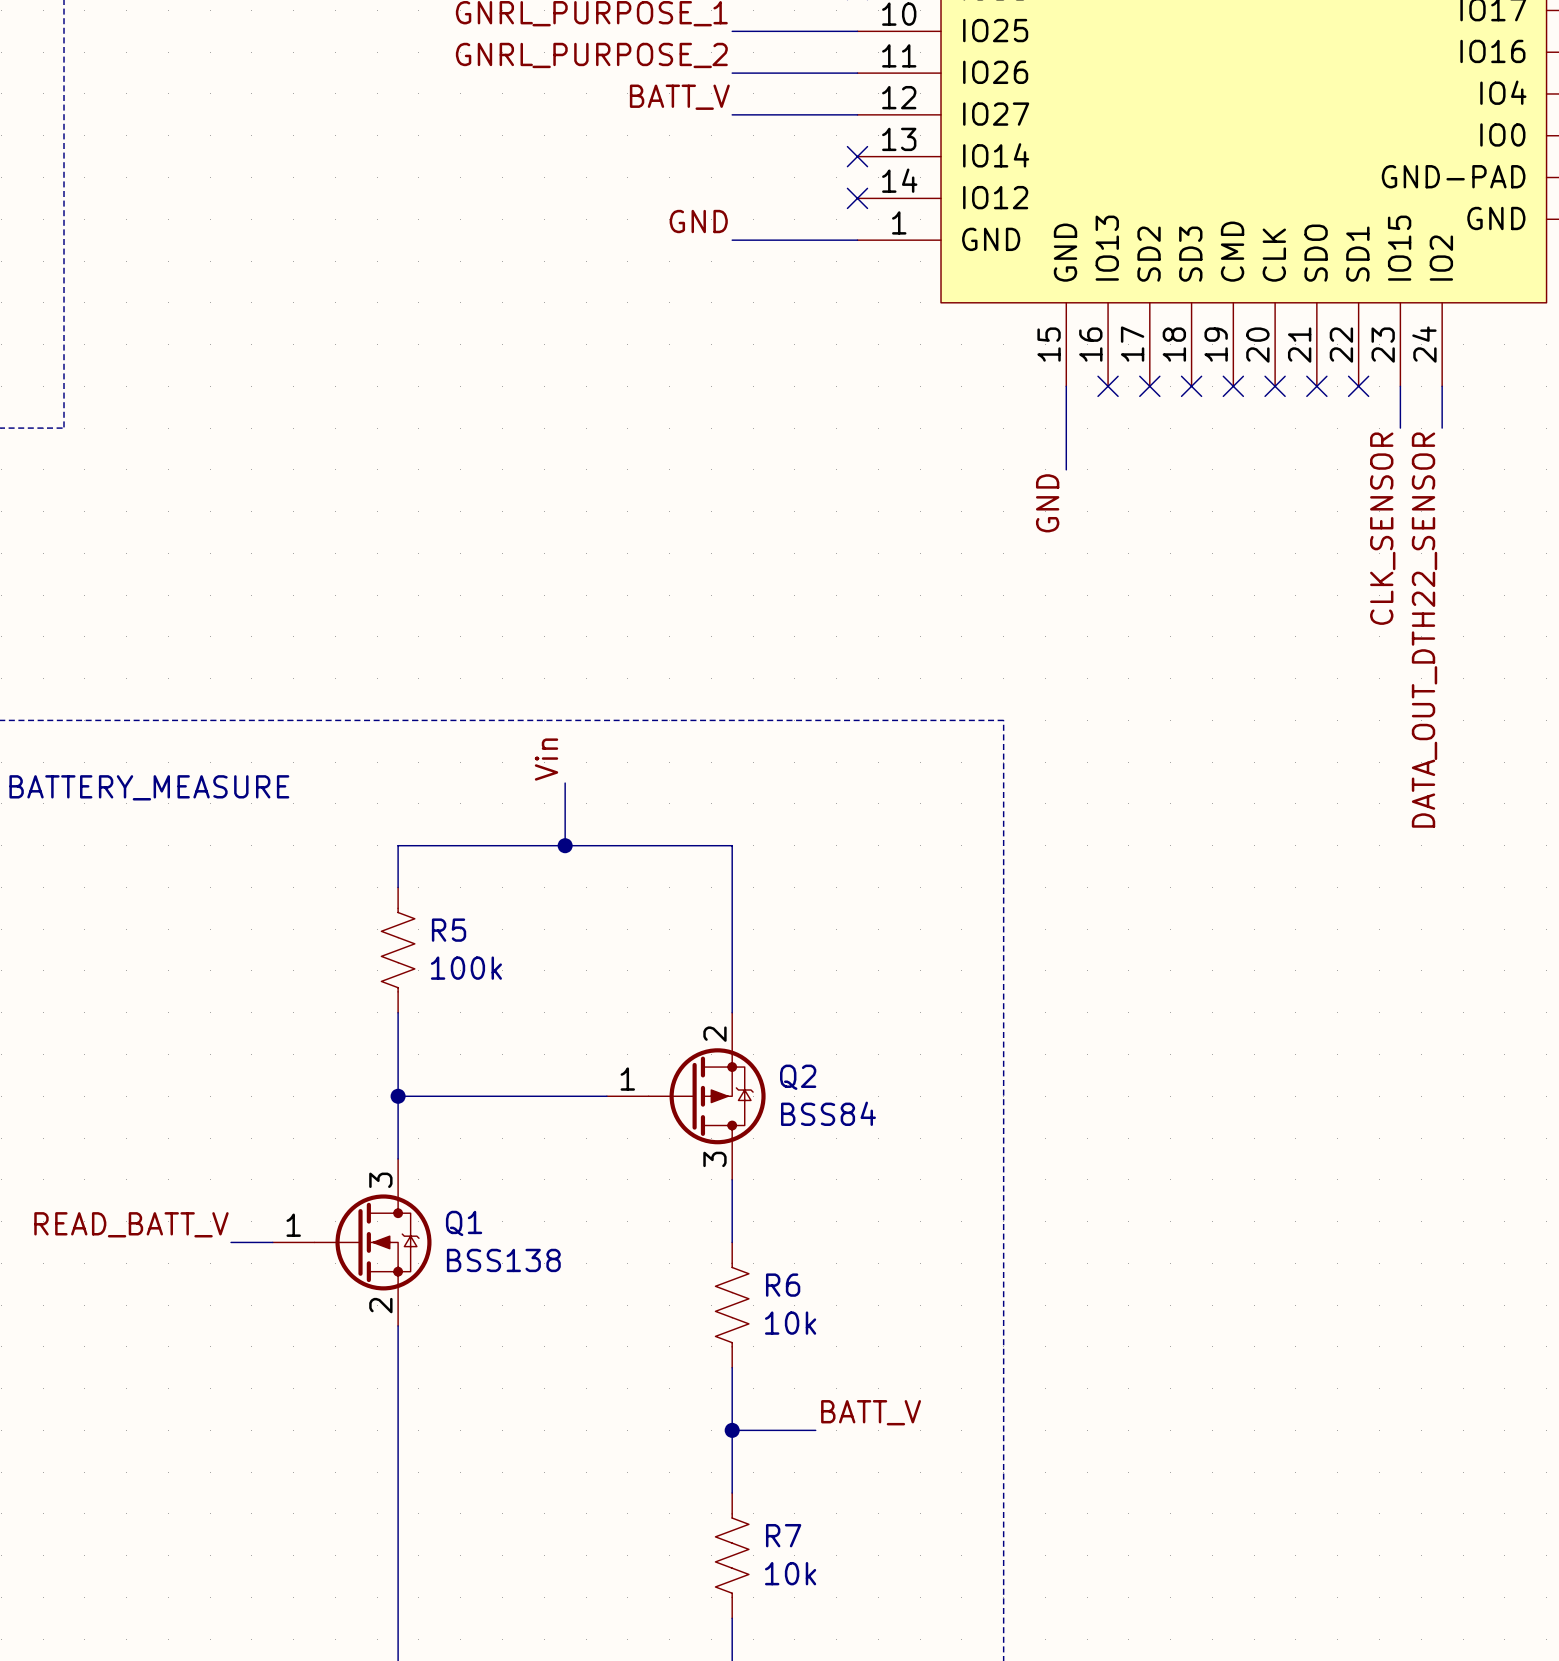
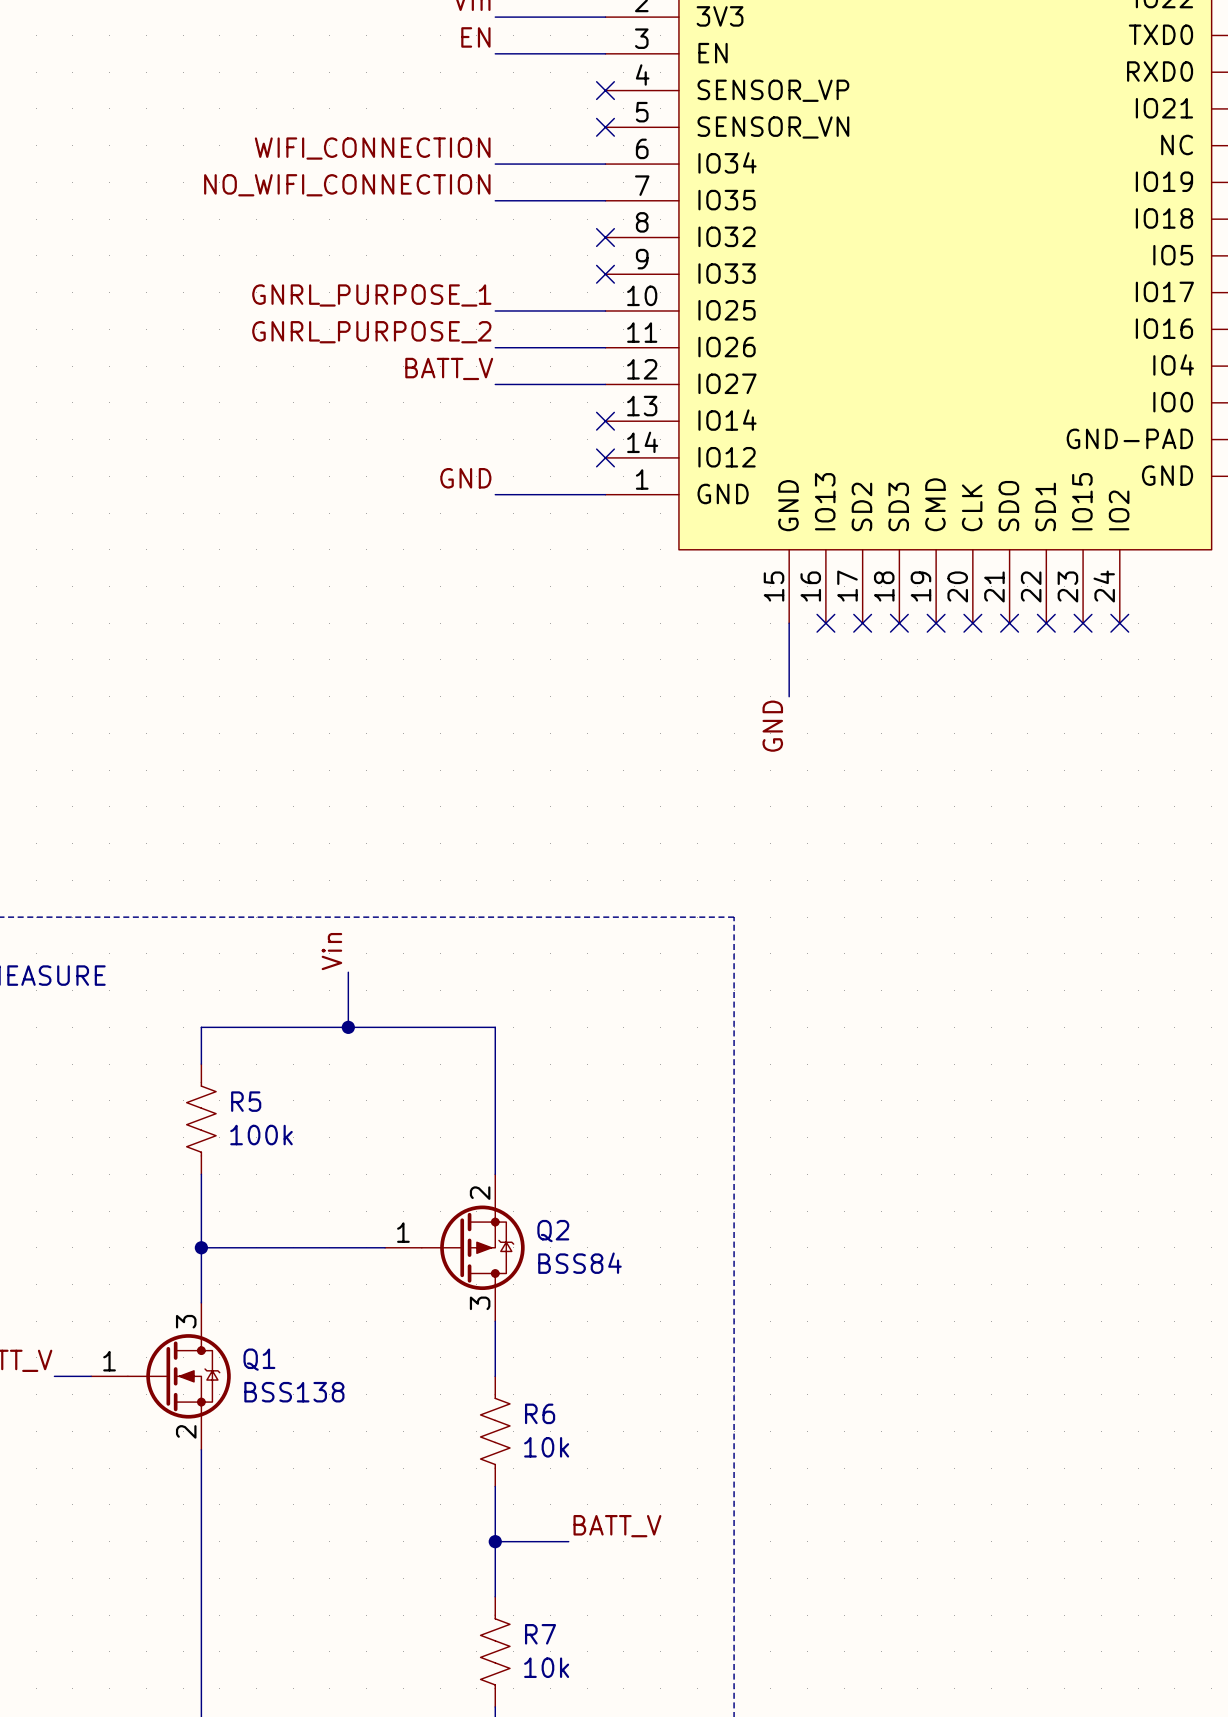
wire: (1400, 386) (1400, 428) -> none
no-connect mark: none -> (1083, 623)
wire: (1442, 386) (1442, 428) -> none
no-connect mark: none -> (1119, 623)
label: CLK_SENSOR (1382, 528) -> none
label: DATA_OUT_DTH22_SENSOR (1424, 630) -> none

